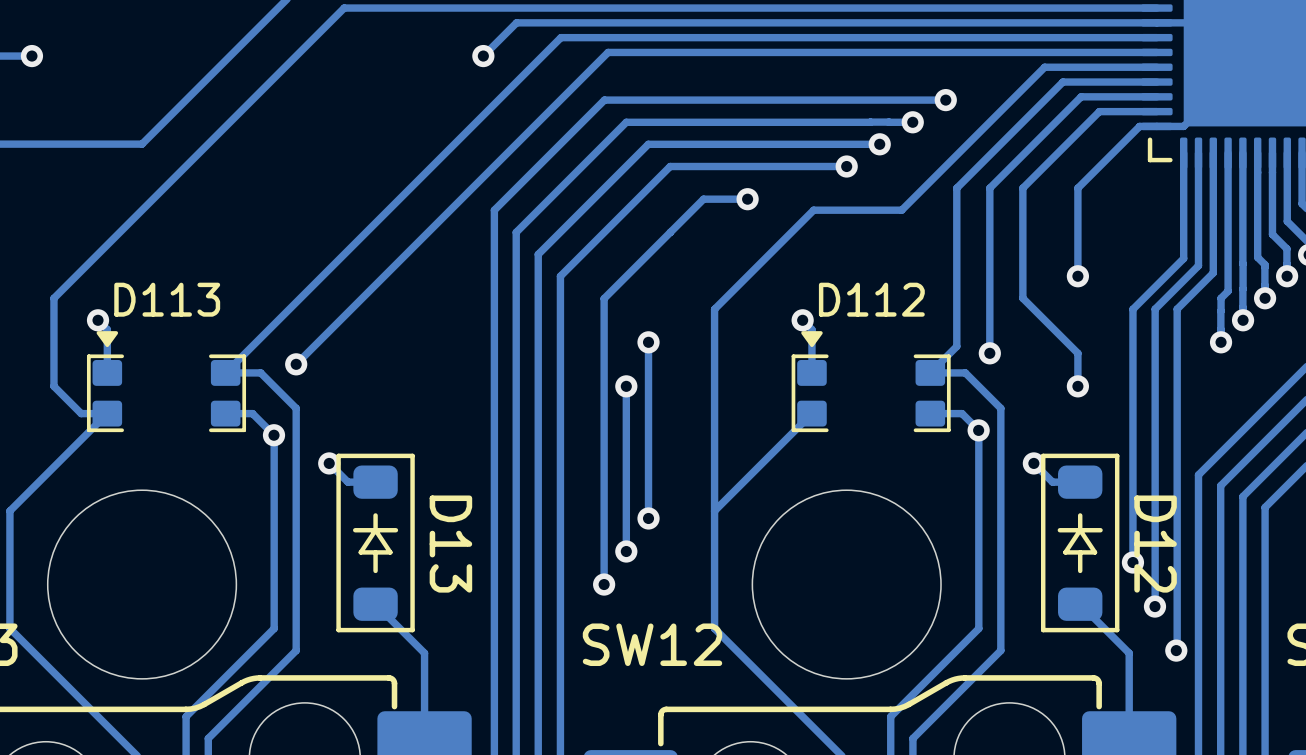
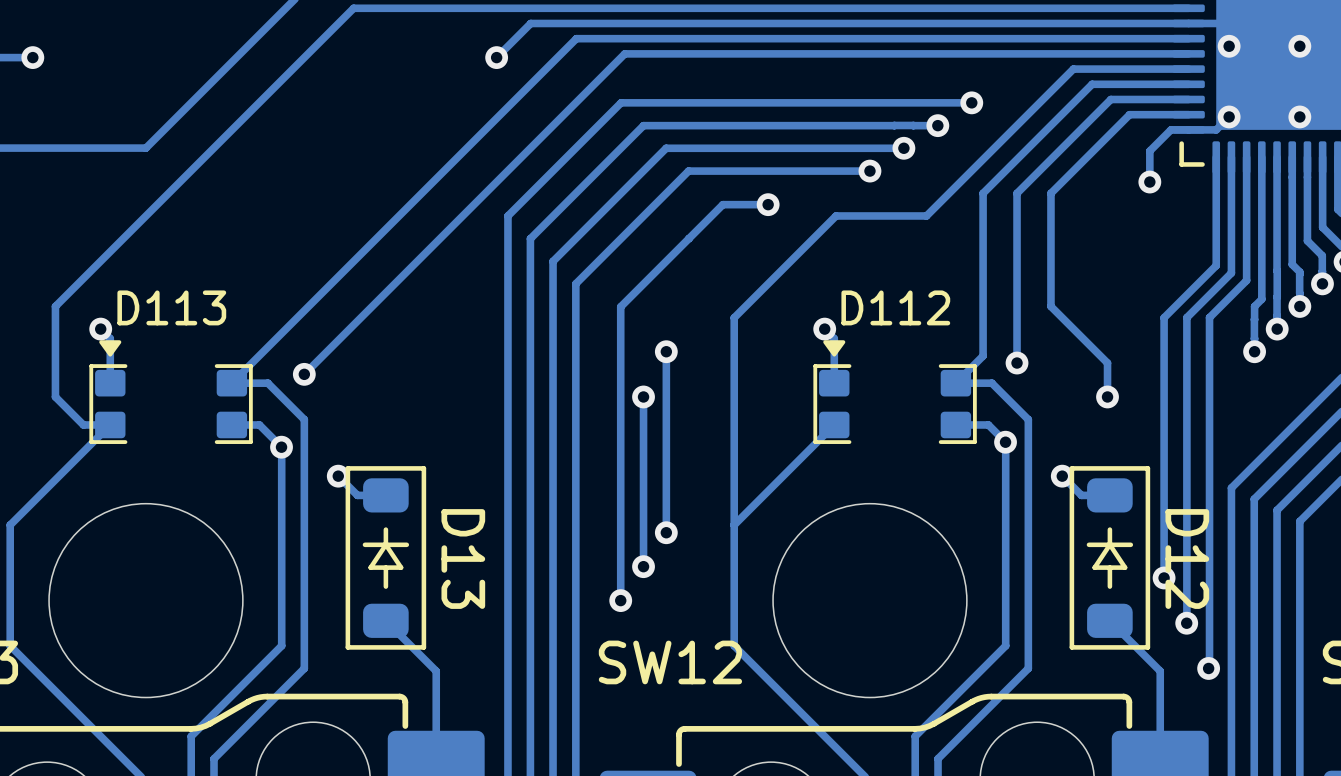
via: none -> (1229, 46)
via: none -> (1299, 46)
via: none -> (1229, 116)
via: none -> (1299, 116)
track: (1119, 147) (1077, 188) (1077, 276) -> (1149, 151) (1149, 182)
via: none -> (1149, 182)
via: (1077, 276) -> none

